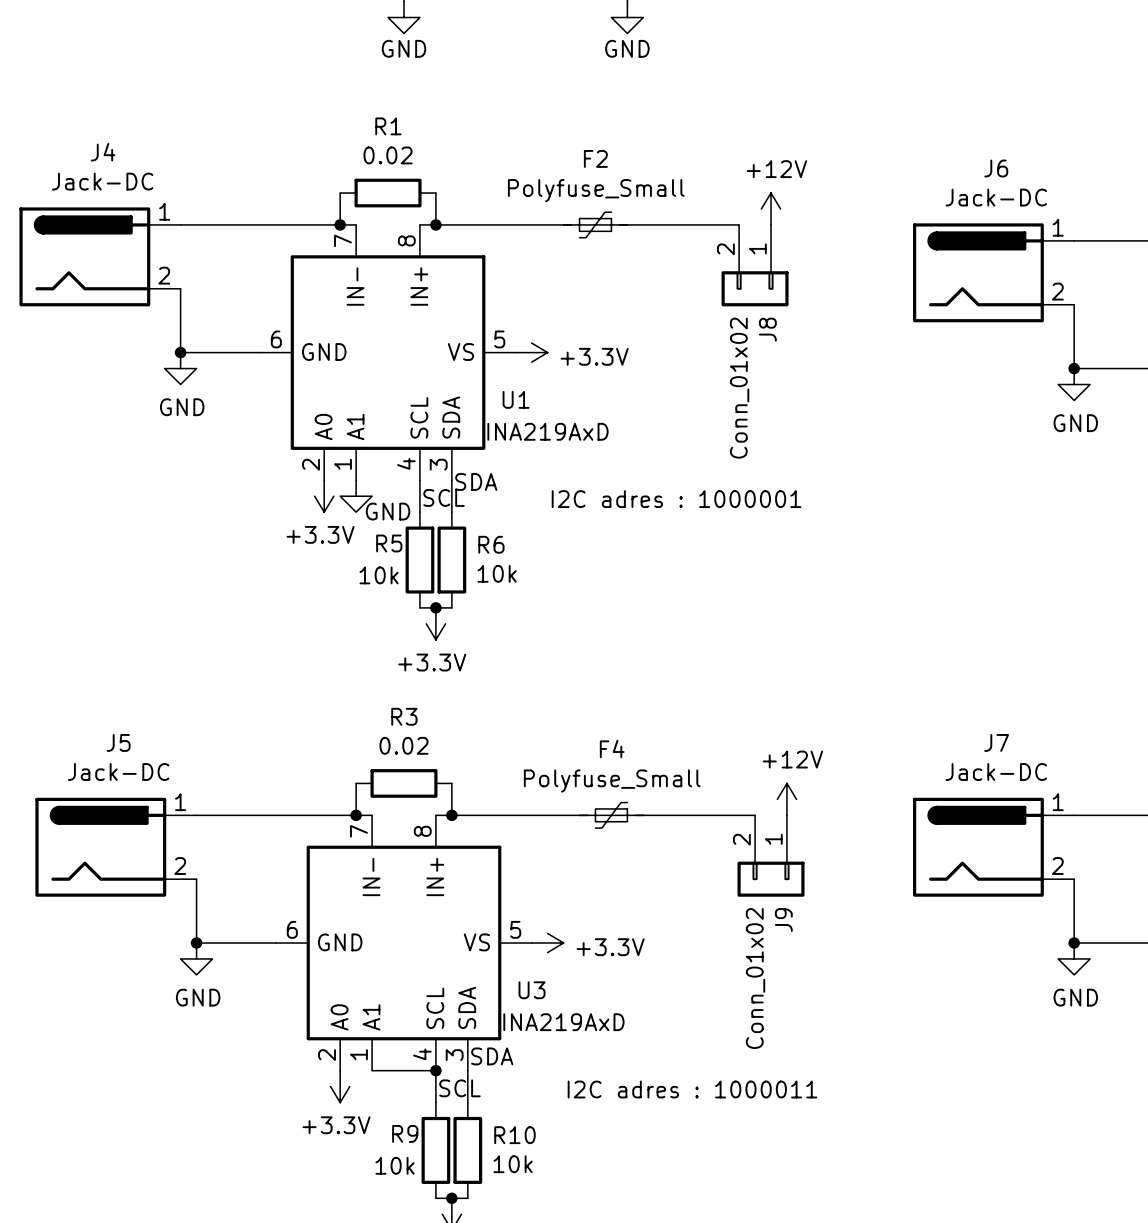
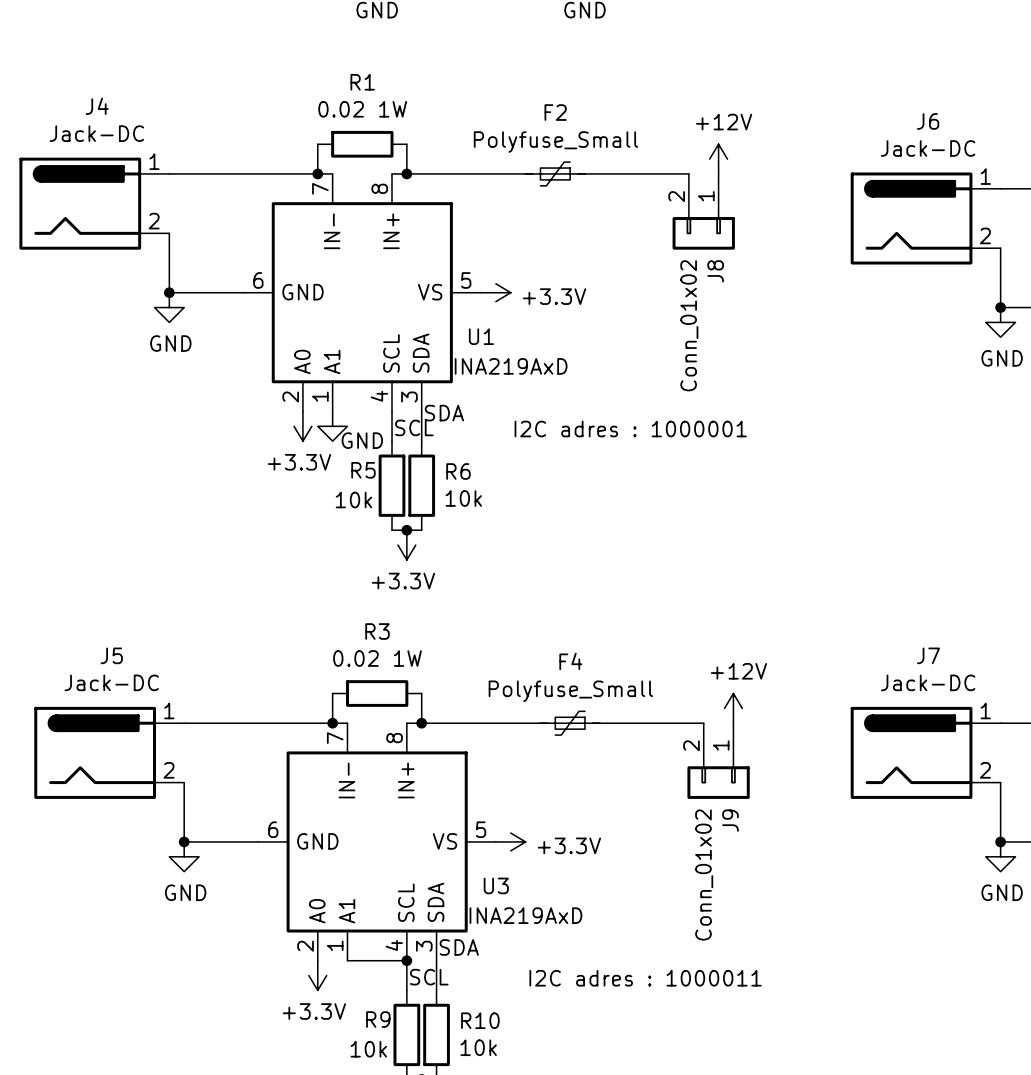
R1 value: 0.02 (388, 155) -> 0.02 1W (362, 109)
R3 value: 0.02 (404, 745) -> 0.02 1W (377, 658)

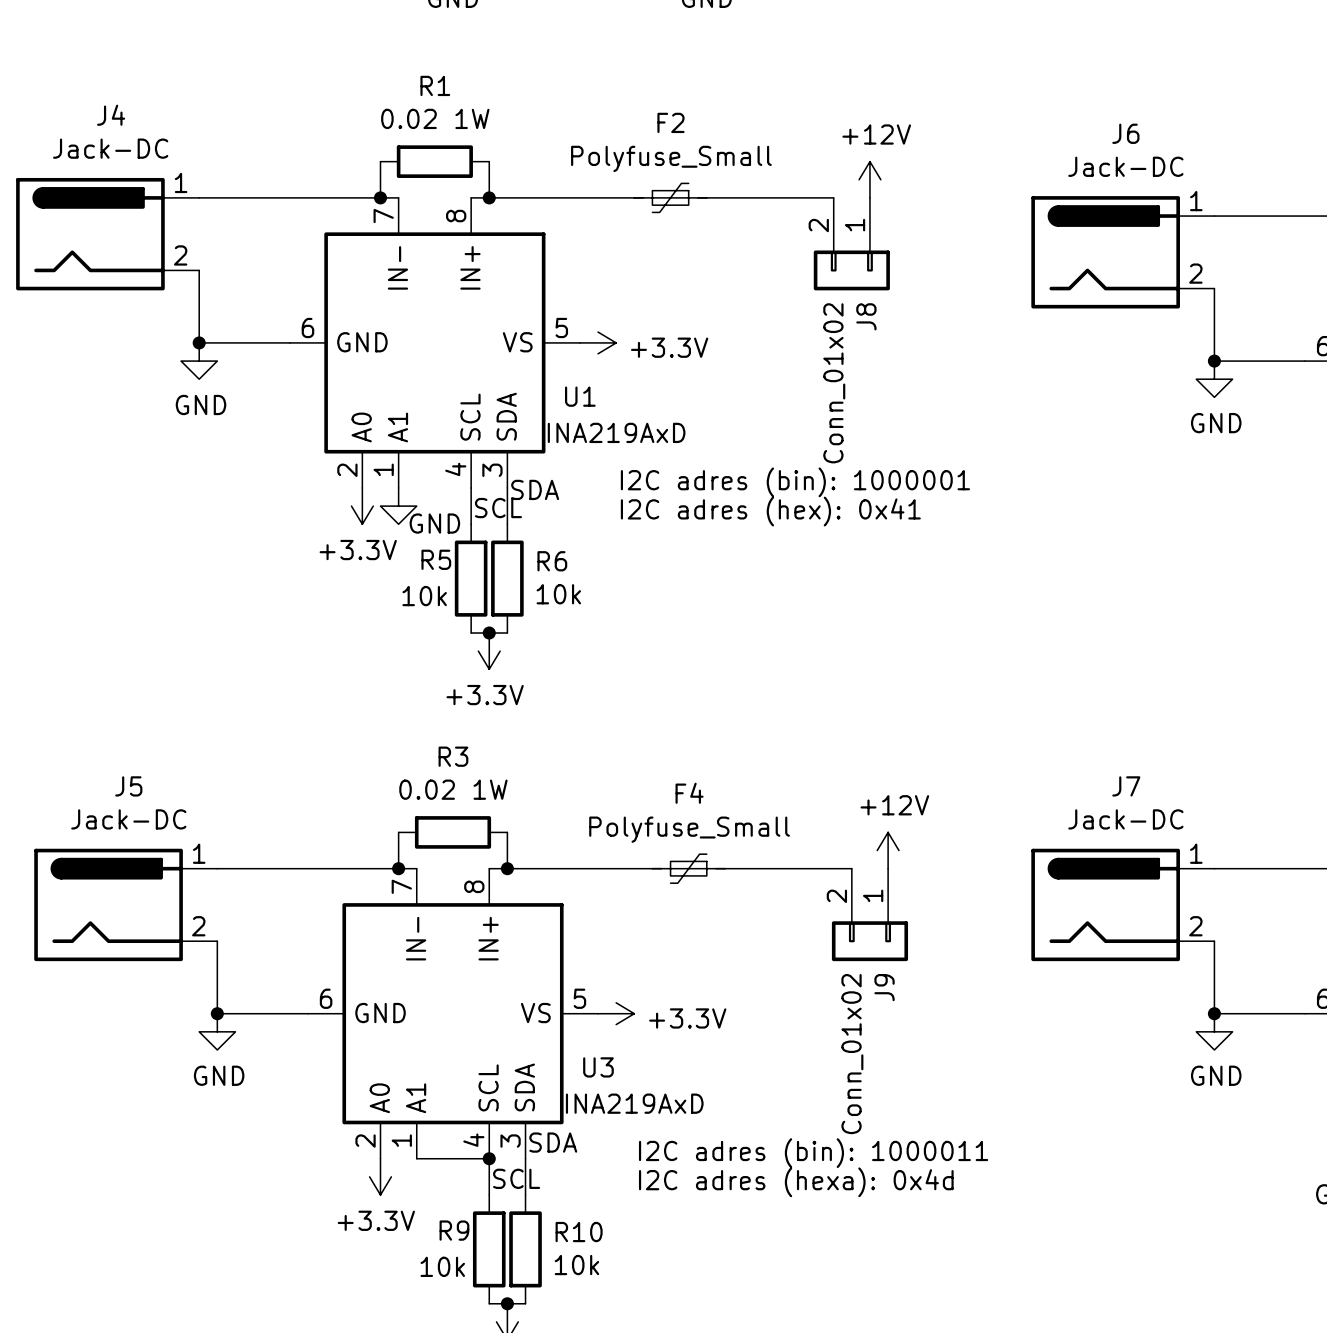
text: none -> I2C adres (bin): 1000001 (795, 482)
text: I2C adres : 1000001 (630, 429) -> I2C adres (hex): 0x41 (770, 511)
text: none -> I2C adres (bin): 1000011 (813, 1153)
text: I2C adres : 1000011 (645, 978) -> I2C adres (hexa): 0x4d (796, 1182)

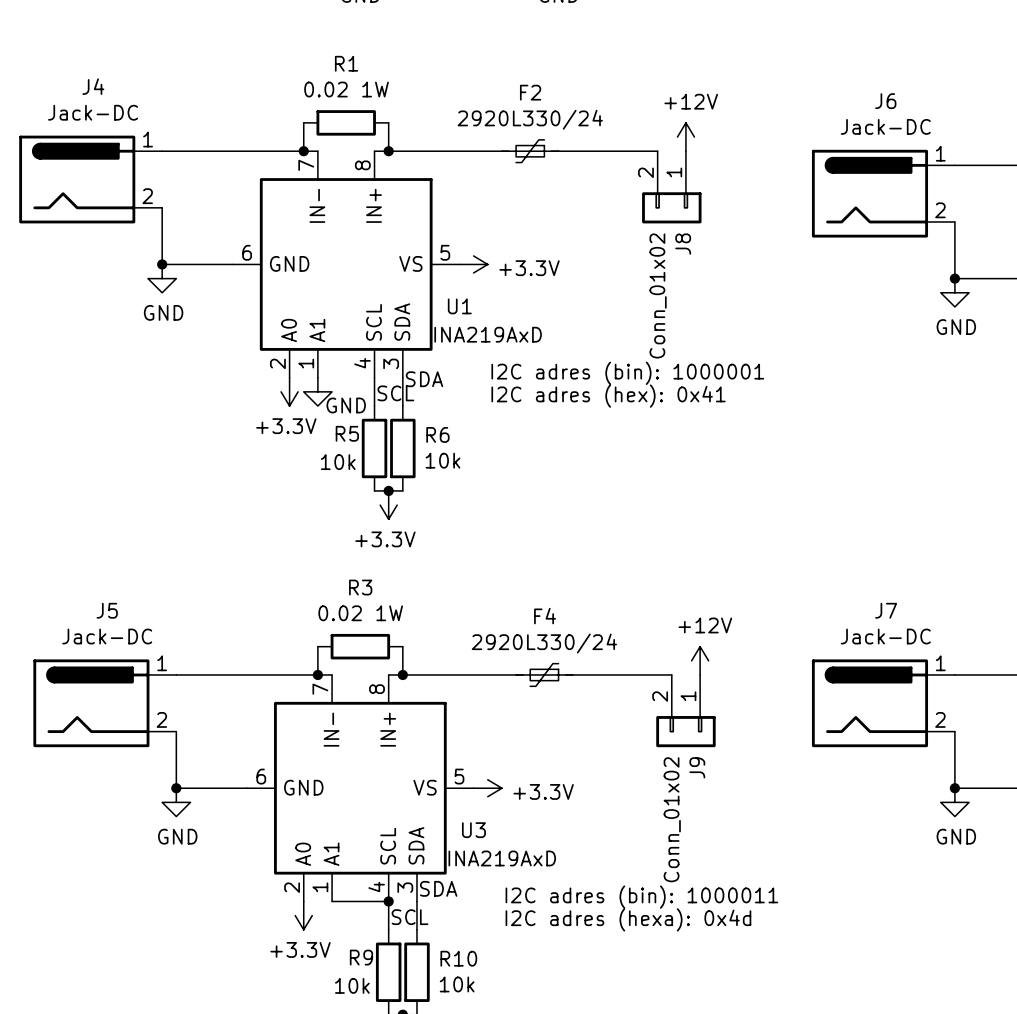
F2 value: Polyfuse_Small (671, 158) -> 2920L330/24 (530, 119)
F4 value: Polyfuse_Small (689, 829) -> 2920L330/24 (544, 643)

